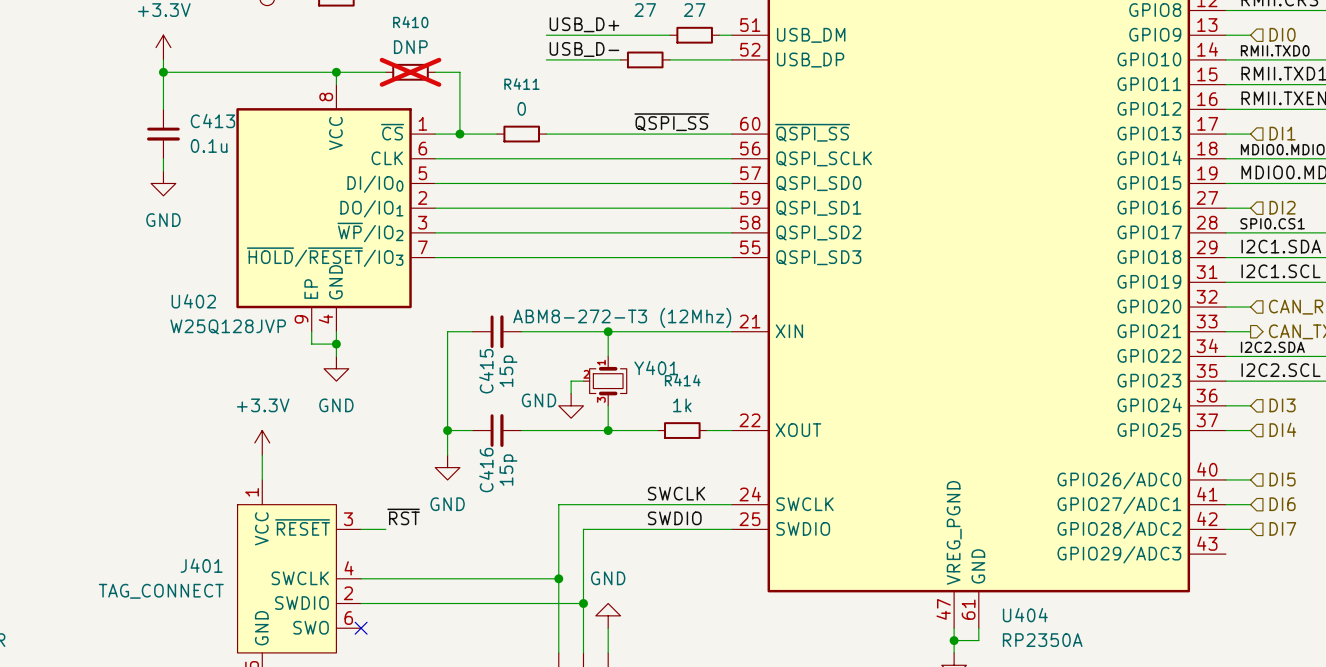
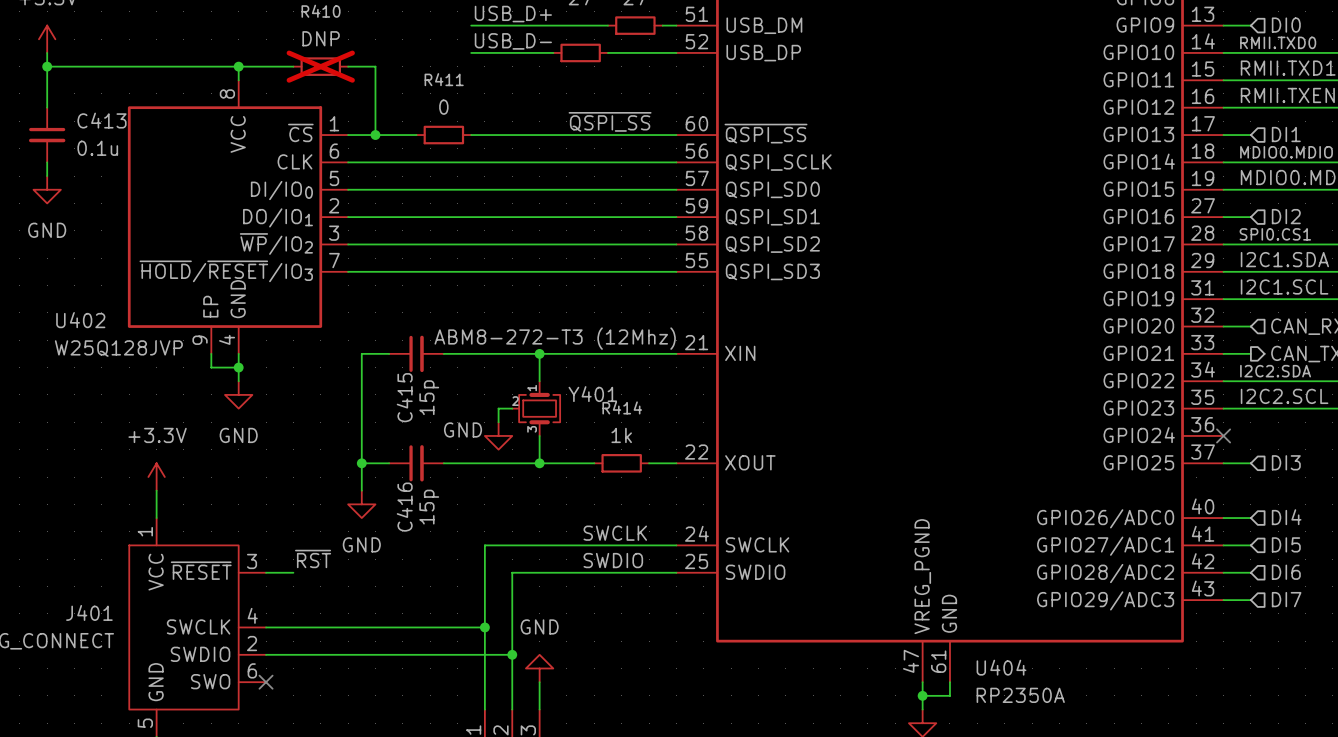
wire: (1225, 405) (1250, 405) -> (1223, 600) (1250, 600)
no-connect mark: none -> (1223, 435)
hierarchical label: DI3 (1282, 405) -> none
hierarchical label: DI4 (1282, 429) -> DI3 (1286, 462)
hierarchical label: DI5 (1282, 479) -> DI4 (1286, 517)
hierarchical label: DI6 (1282, 504) -> DI5 (1286, 544)
hierarchical label: DI7 (1282, 528) -> DI6 (1286, 572)
hierarchical label: none -> DI7 (1286, 599)

